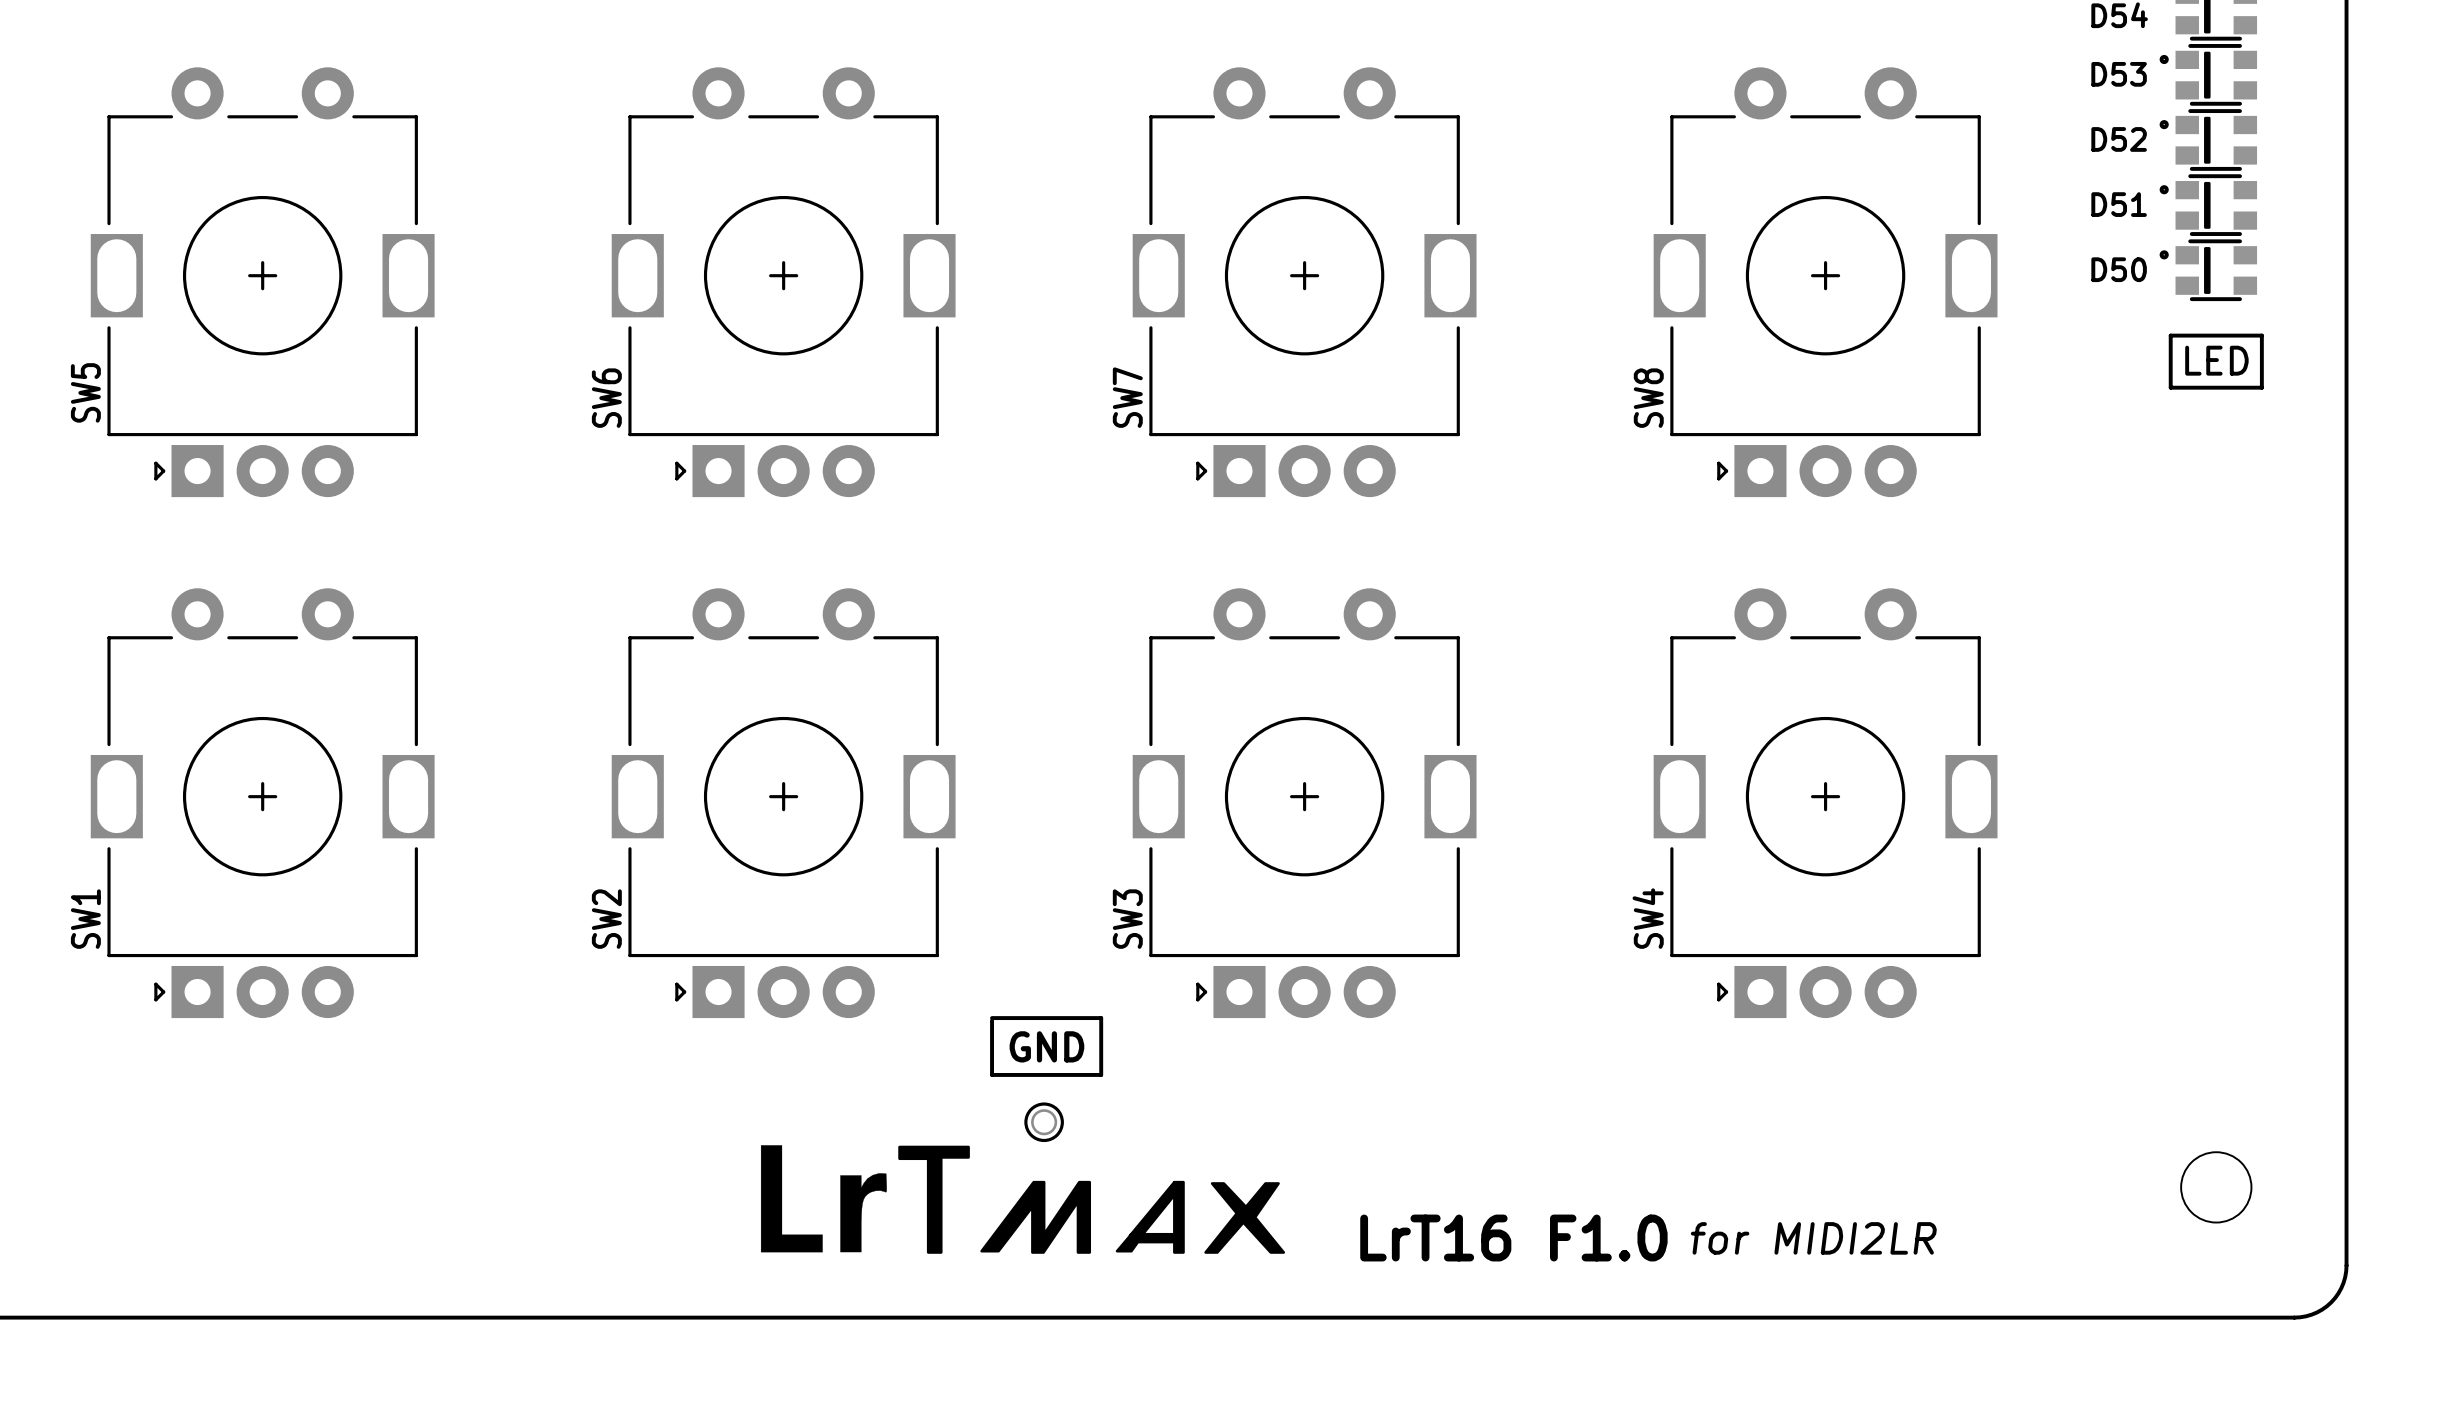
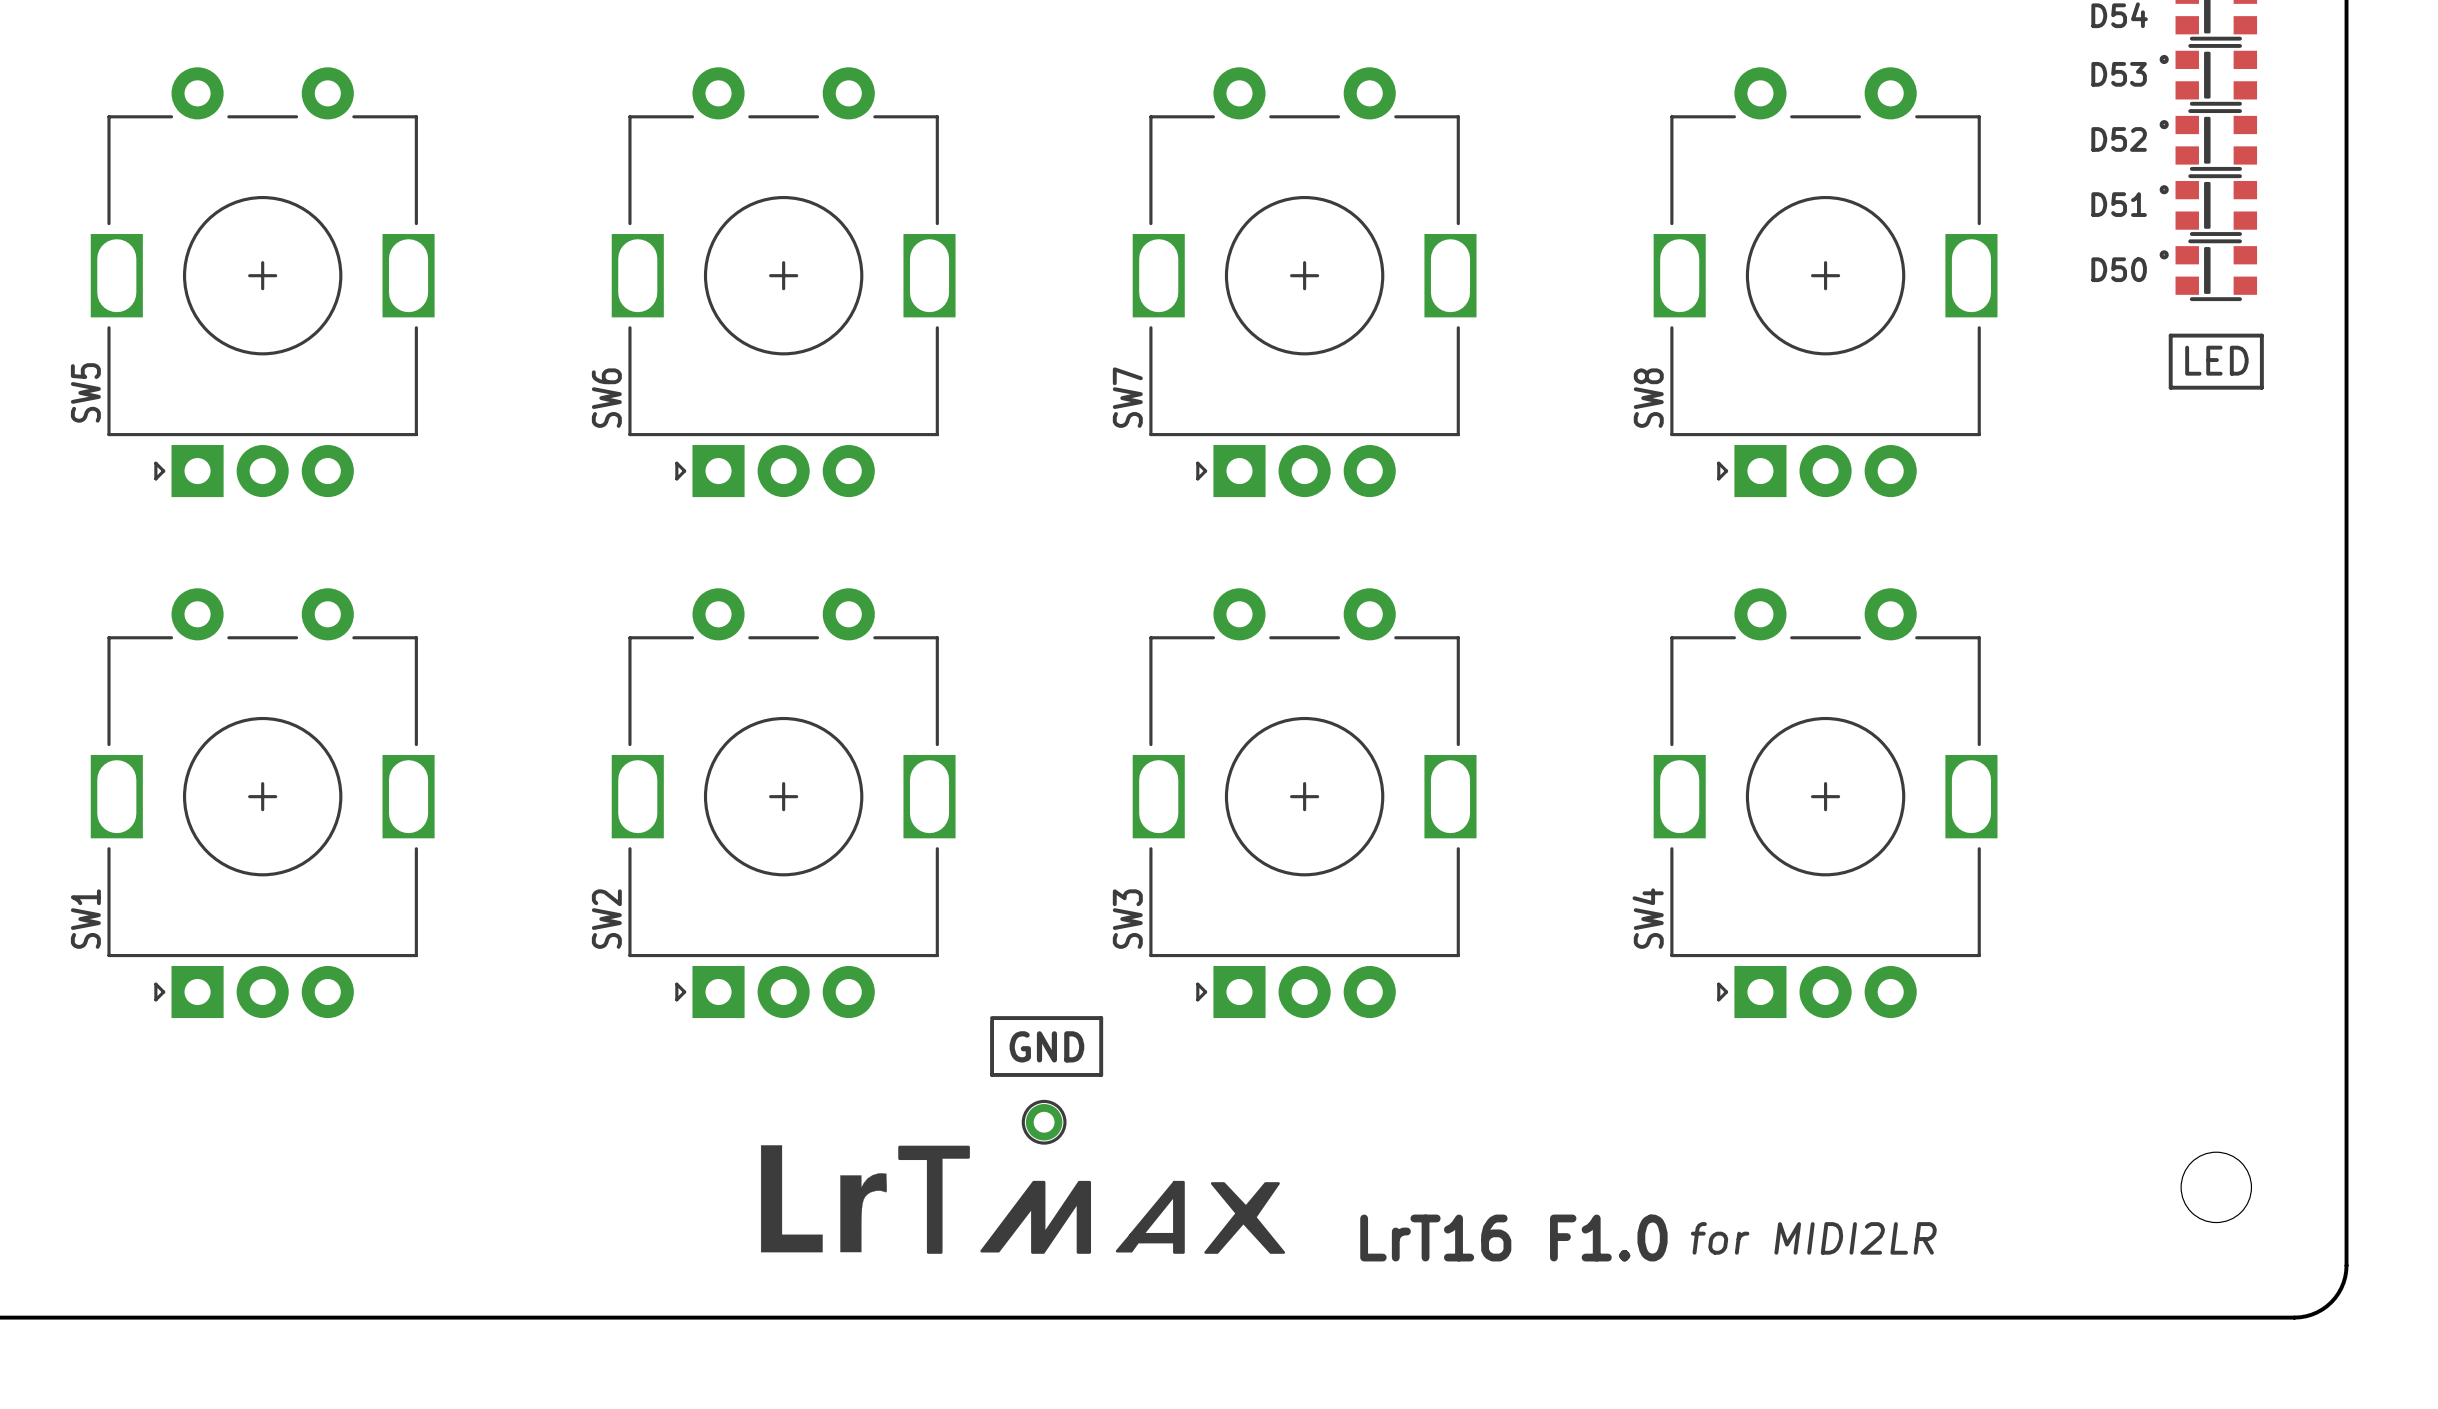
part footprint: [1024, 1102, 1064, 1143] -> [1021, 1099, 1067, 1145]

